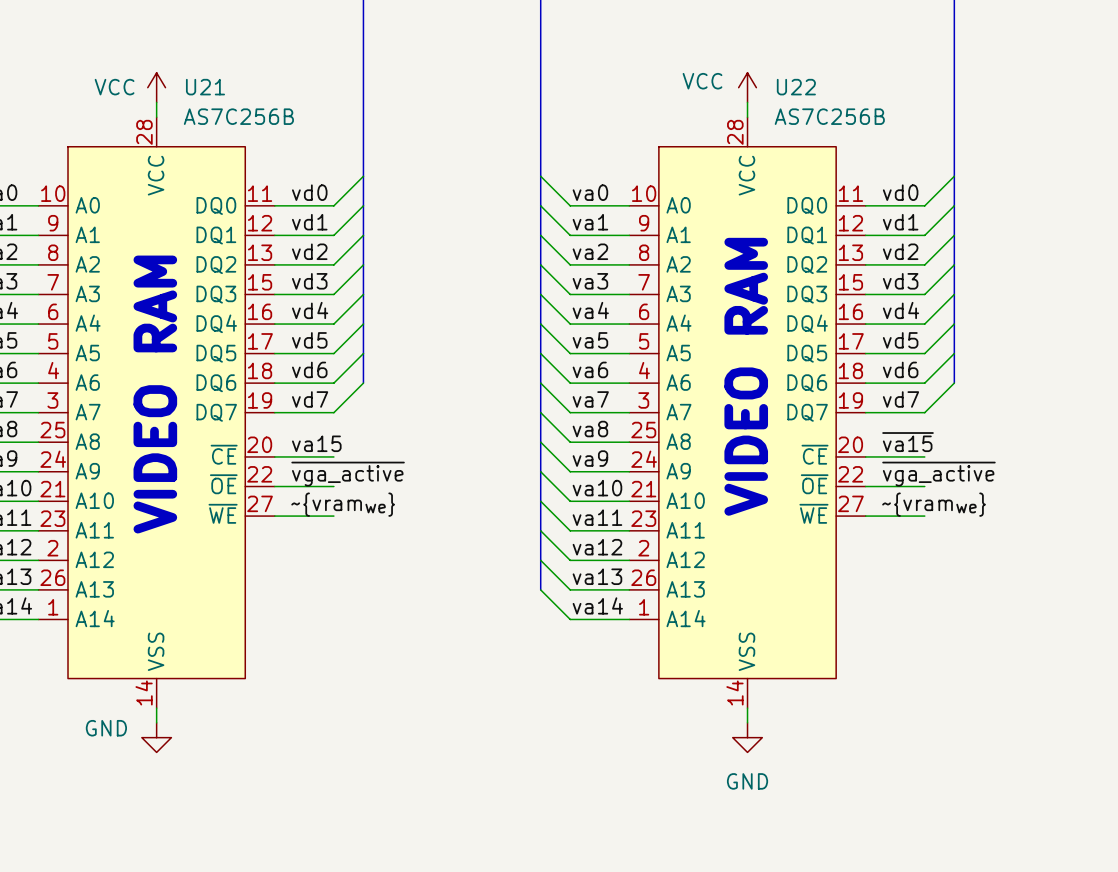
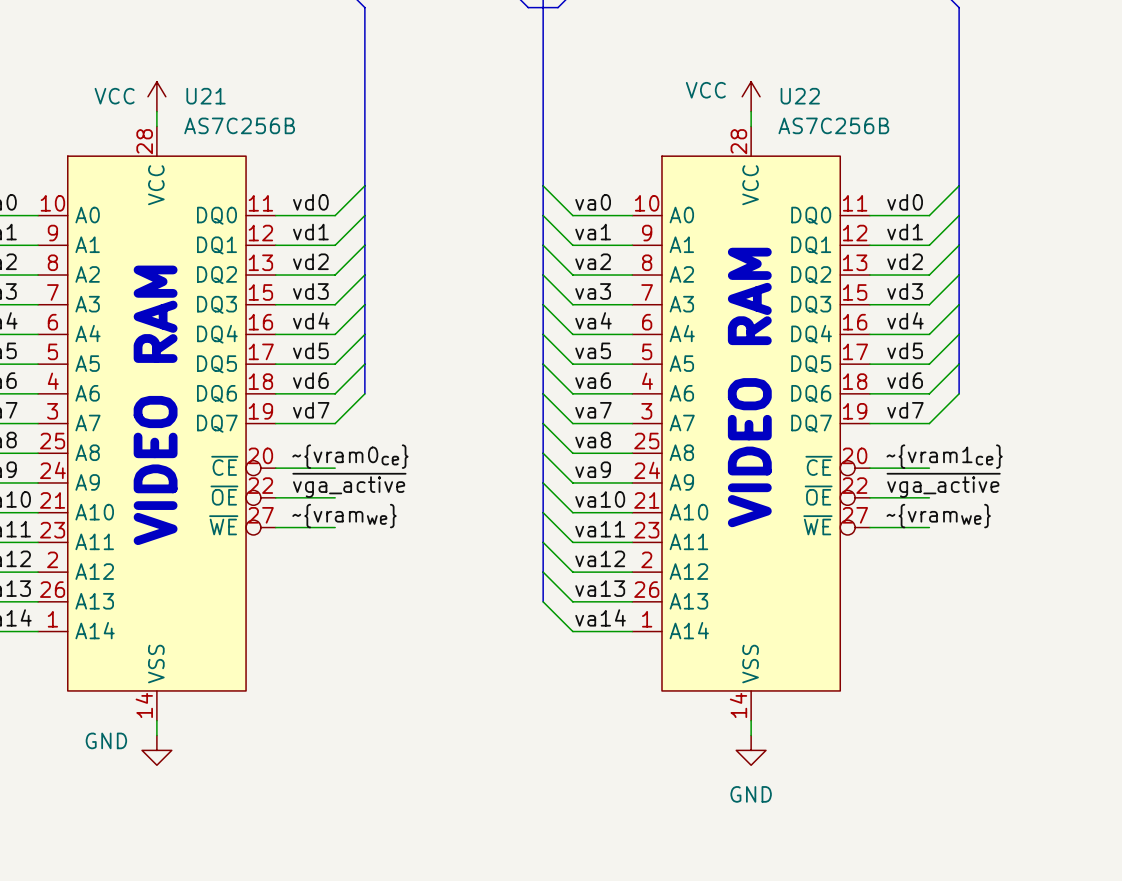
U21 symbol: [38, 117, 275, 709] -> [38, 126, 276, 721]
U22 symbol: [629, 117, 866, 709] -> [632, 126, 870, 721]
label: ~{va15} (908, 442) -> ~{vram1ce} (944, 456)
label: va15 (316, 443) -> ~{vram0ce} (350, 456)

